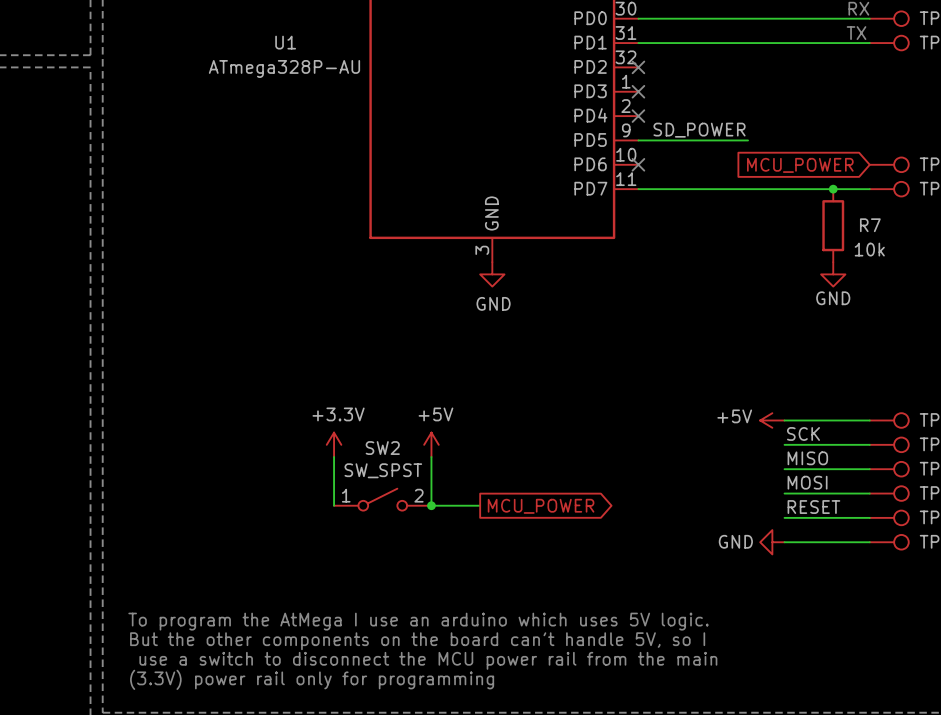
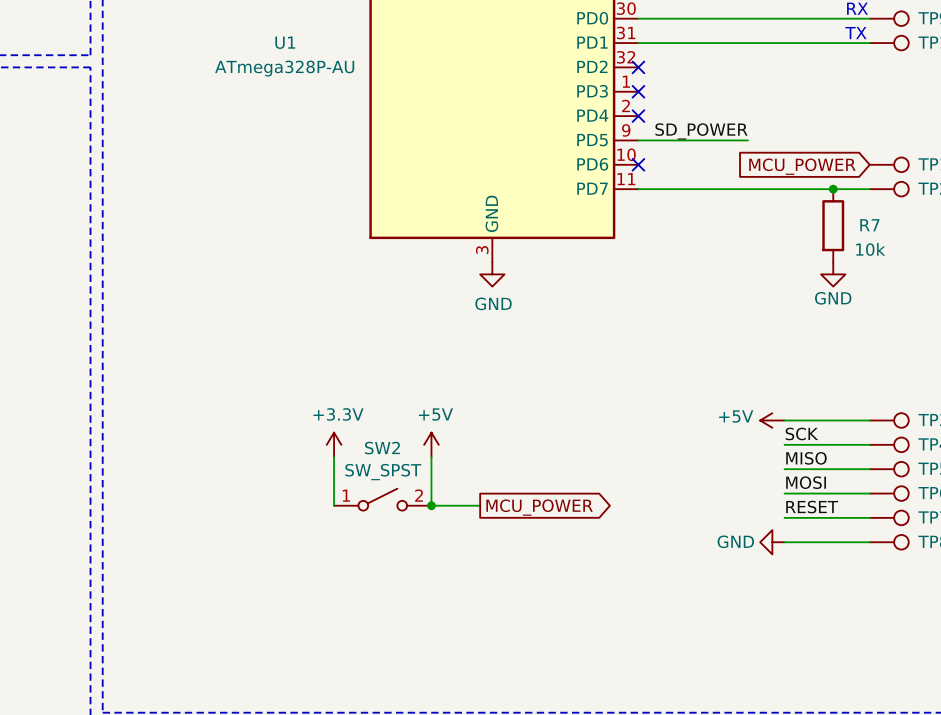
text: To program the AtMega I use an arduino which uses 5V logic. (418, 621) -> none
text: But the other components on the board can't handle 5V, so I (417, 641) -> none
text: use a switch to disconnect the MCU power rail from the main (428, 660) -> none
text: (3.3V) power rail only for programming (312, 679) -> none

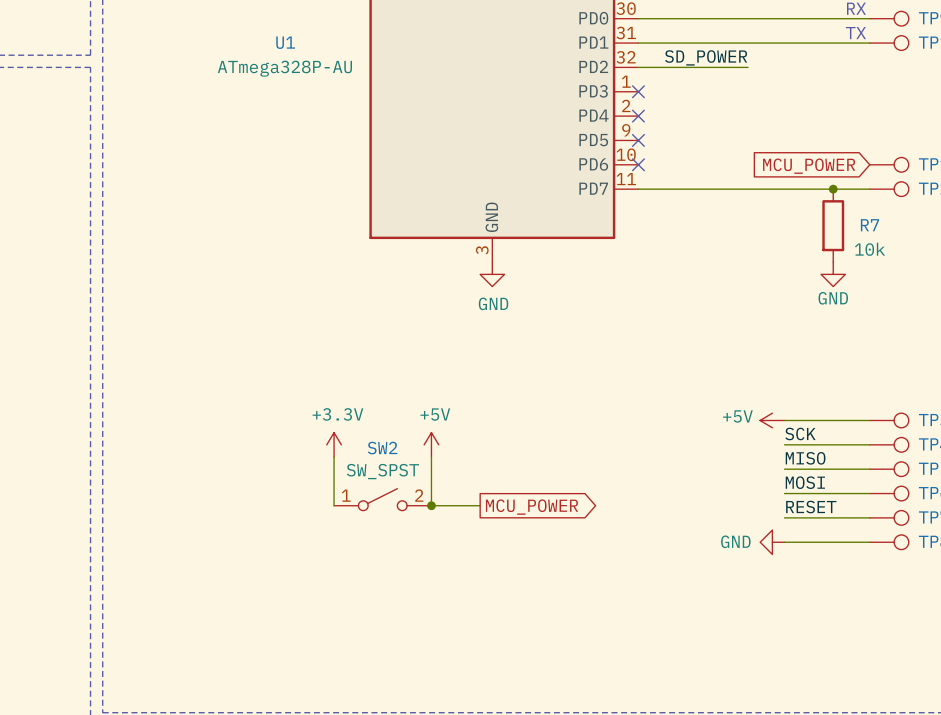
no-connect mark: (638, 67) -> none
label position: SD_POWER (701, 131) -> SD_POWER (706, 57)
wire: (638, 140) (748, 140) -> (638, 67) (748, 67)
no-connect mark: none -> (638, 140)

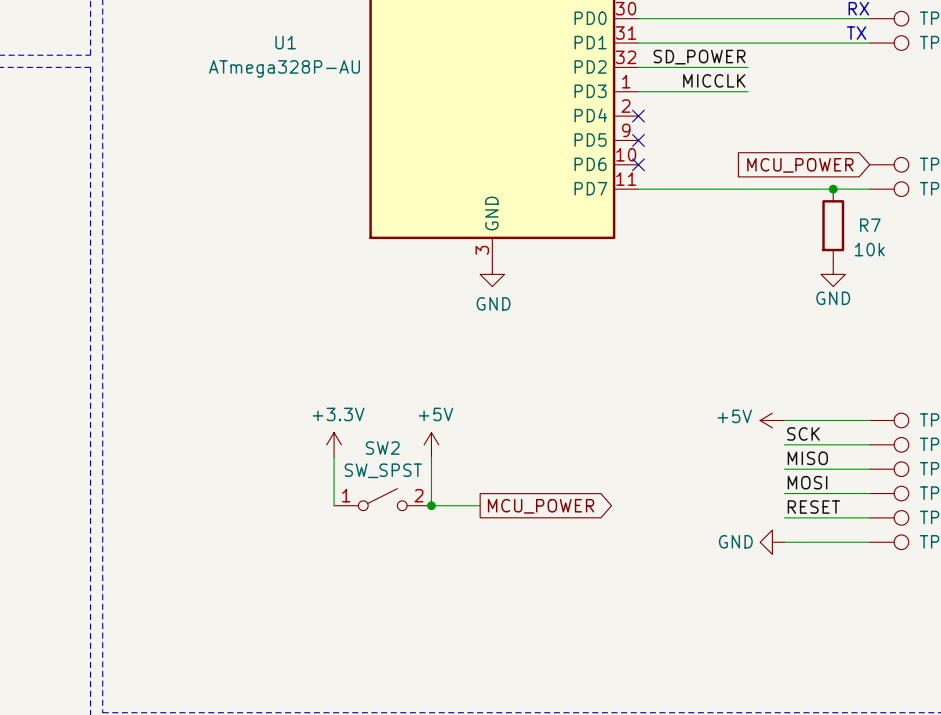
label: none -> MICCLK (714, 80)
wire: none -> (638, 91) (748, 91)
no-connect mark: (638, 91) -> none

